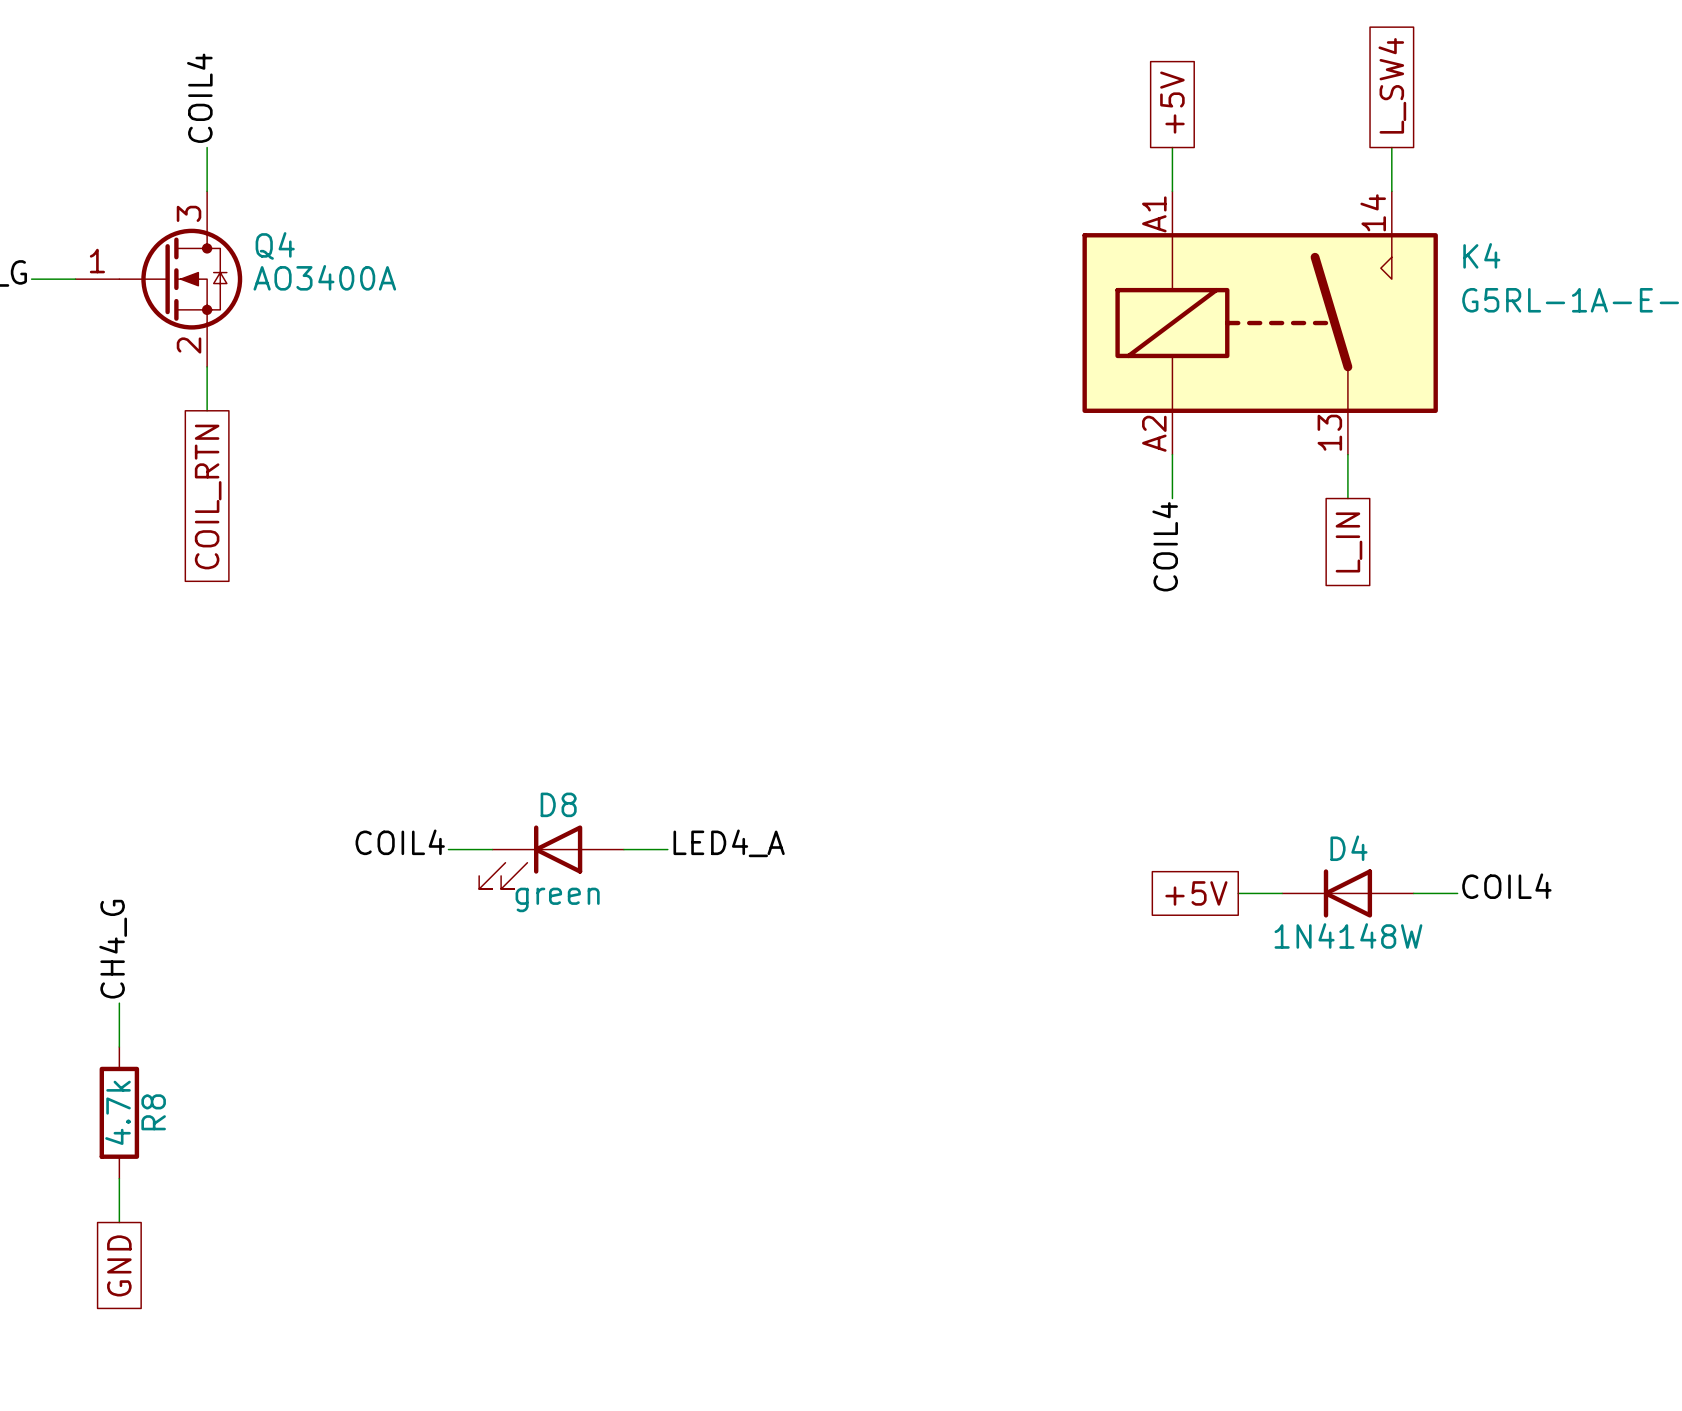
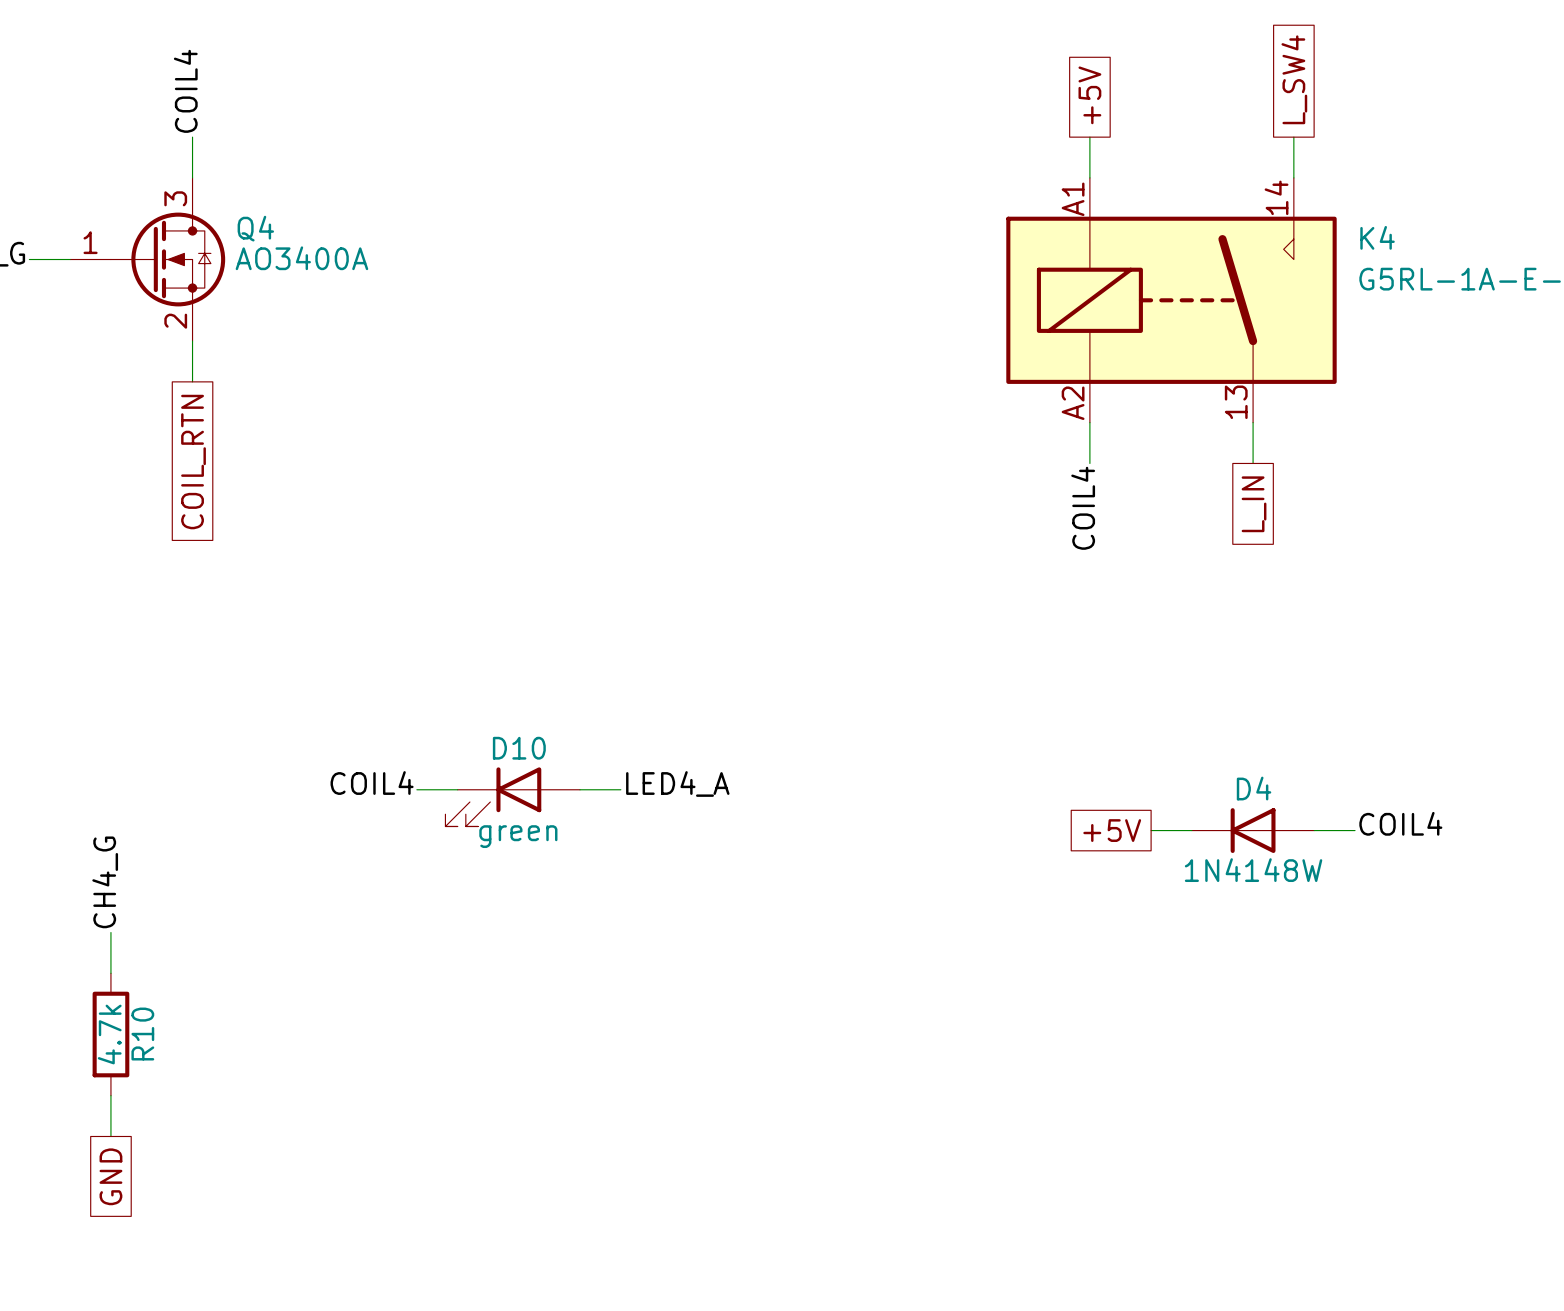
D8 name: D8 (558, 804) -> D10 (519, 748)
R8 name: R8 (153, 1112) -> R10 (142, 1034)

